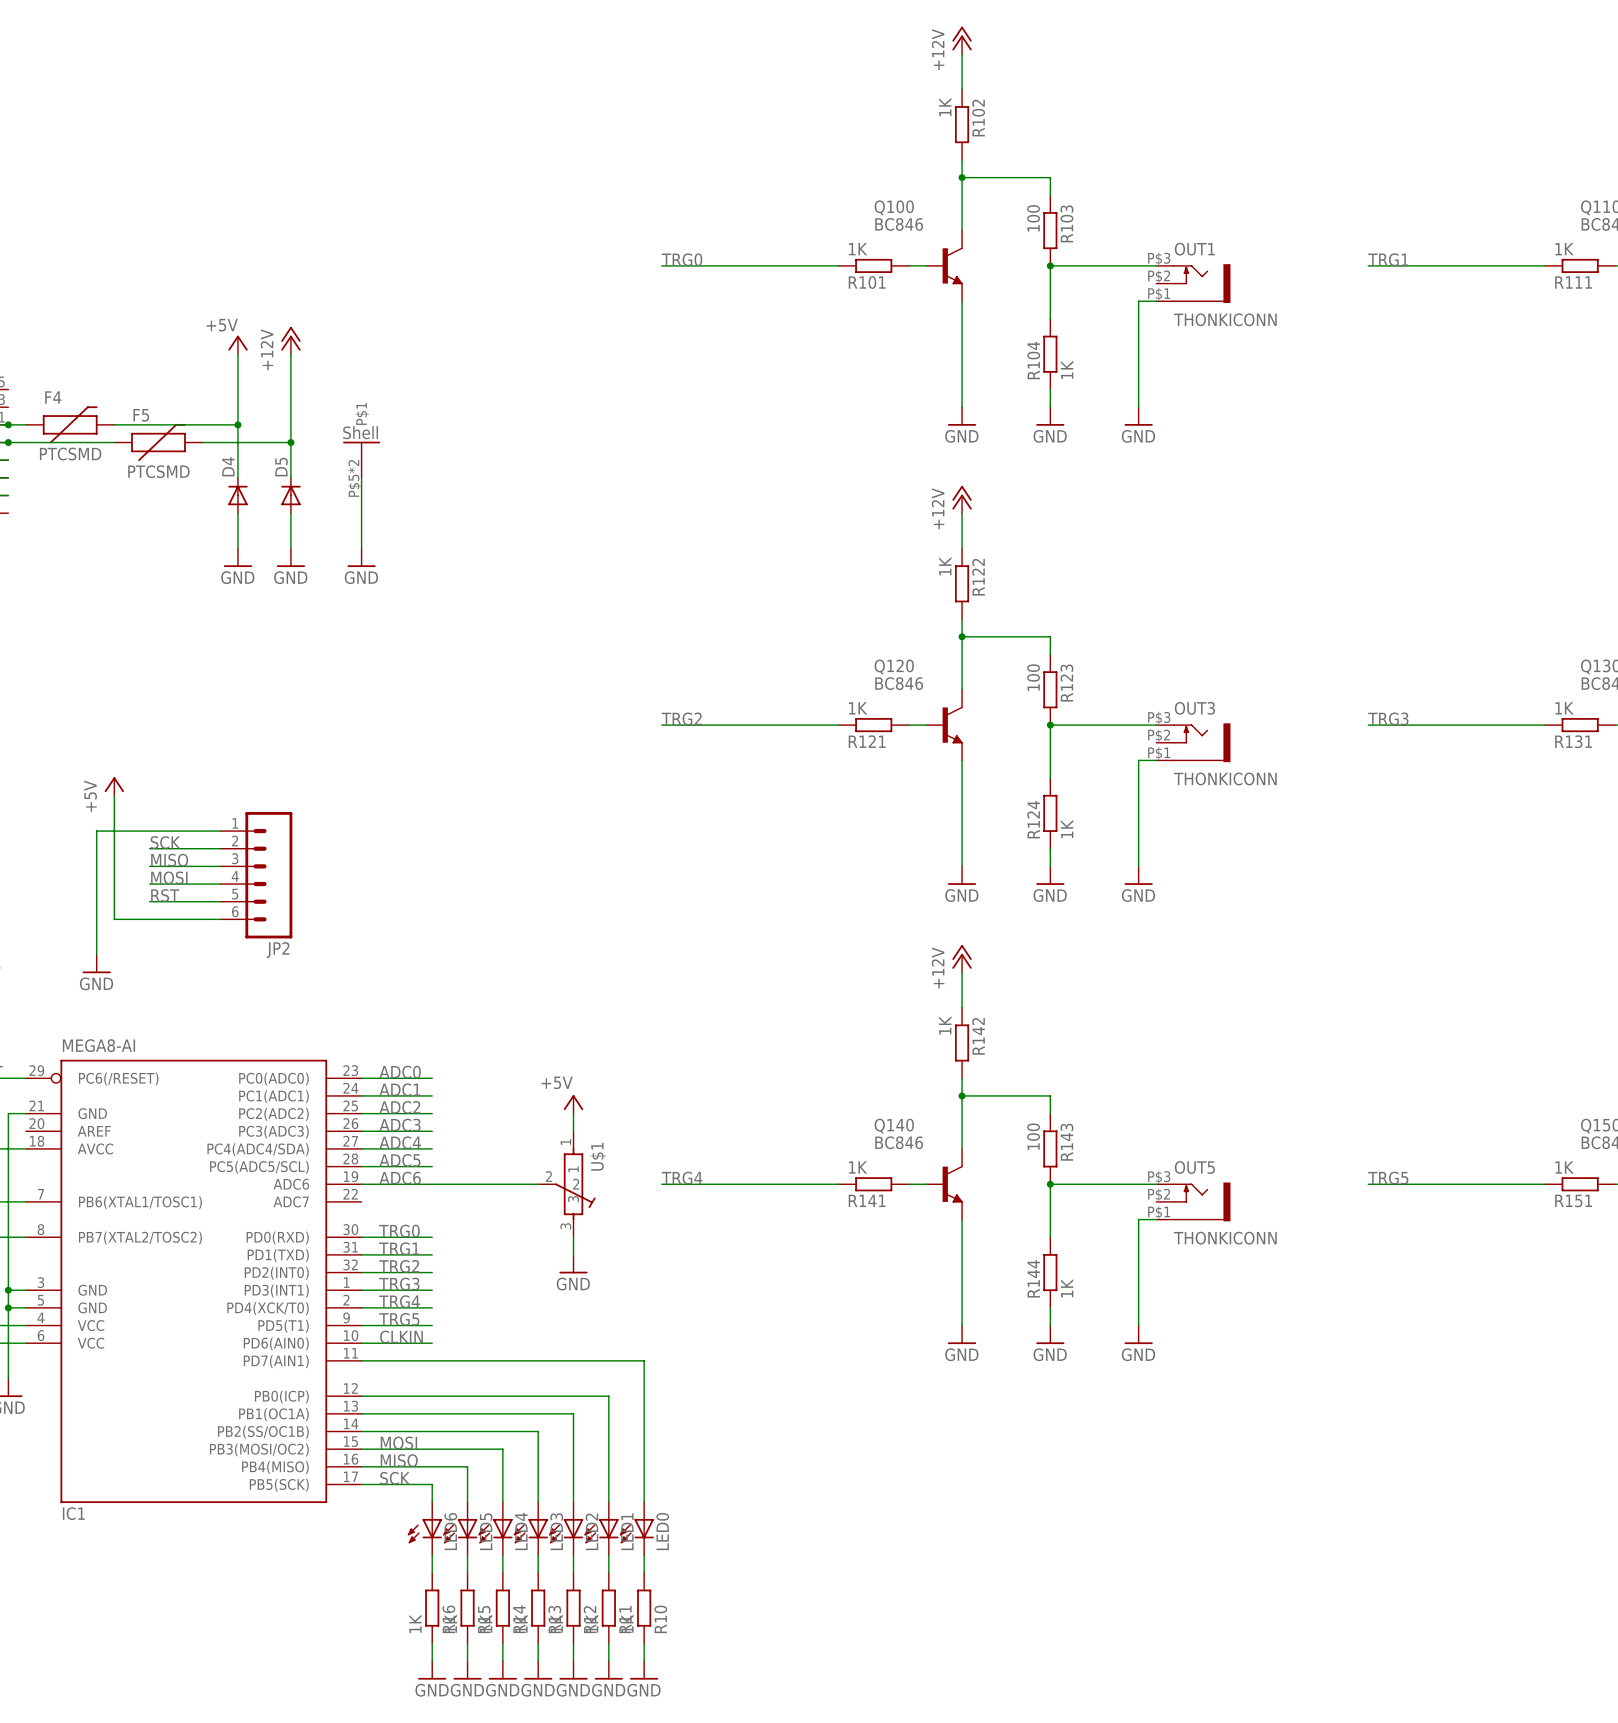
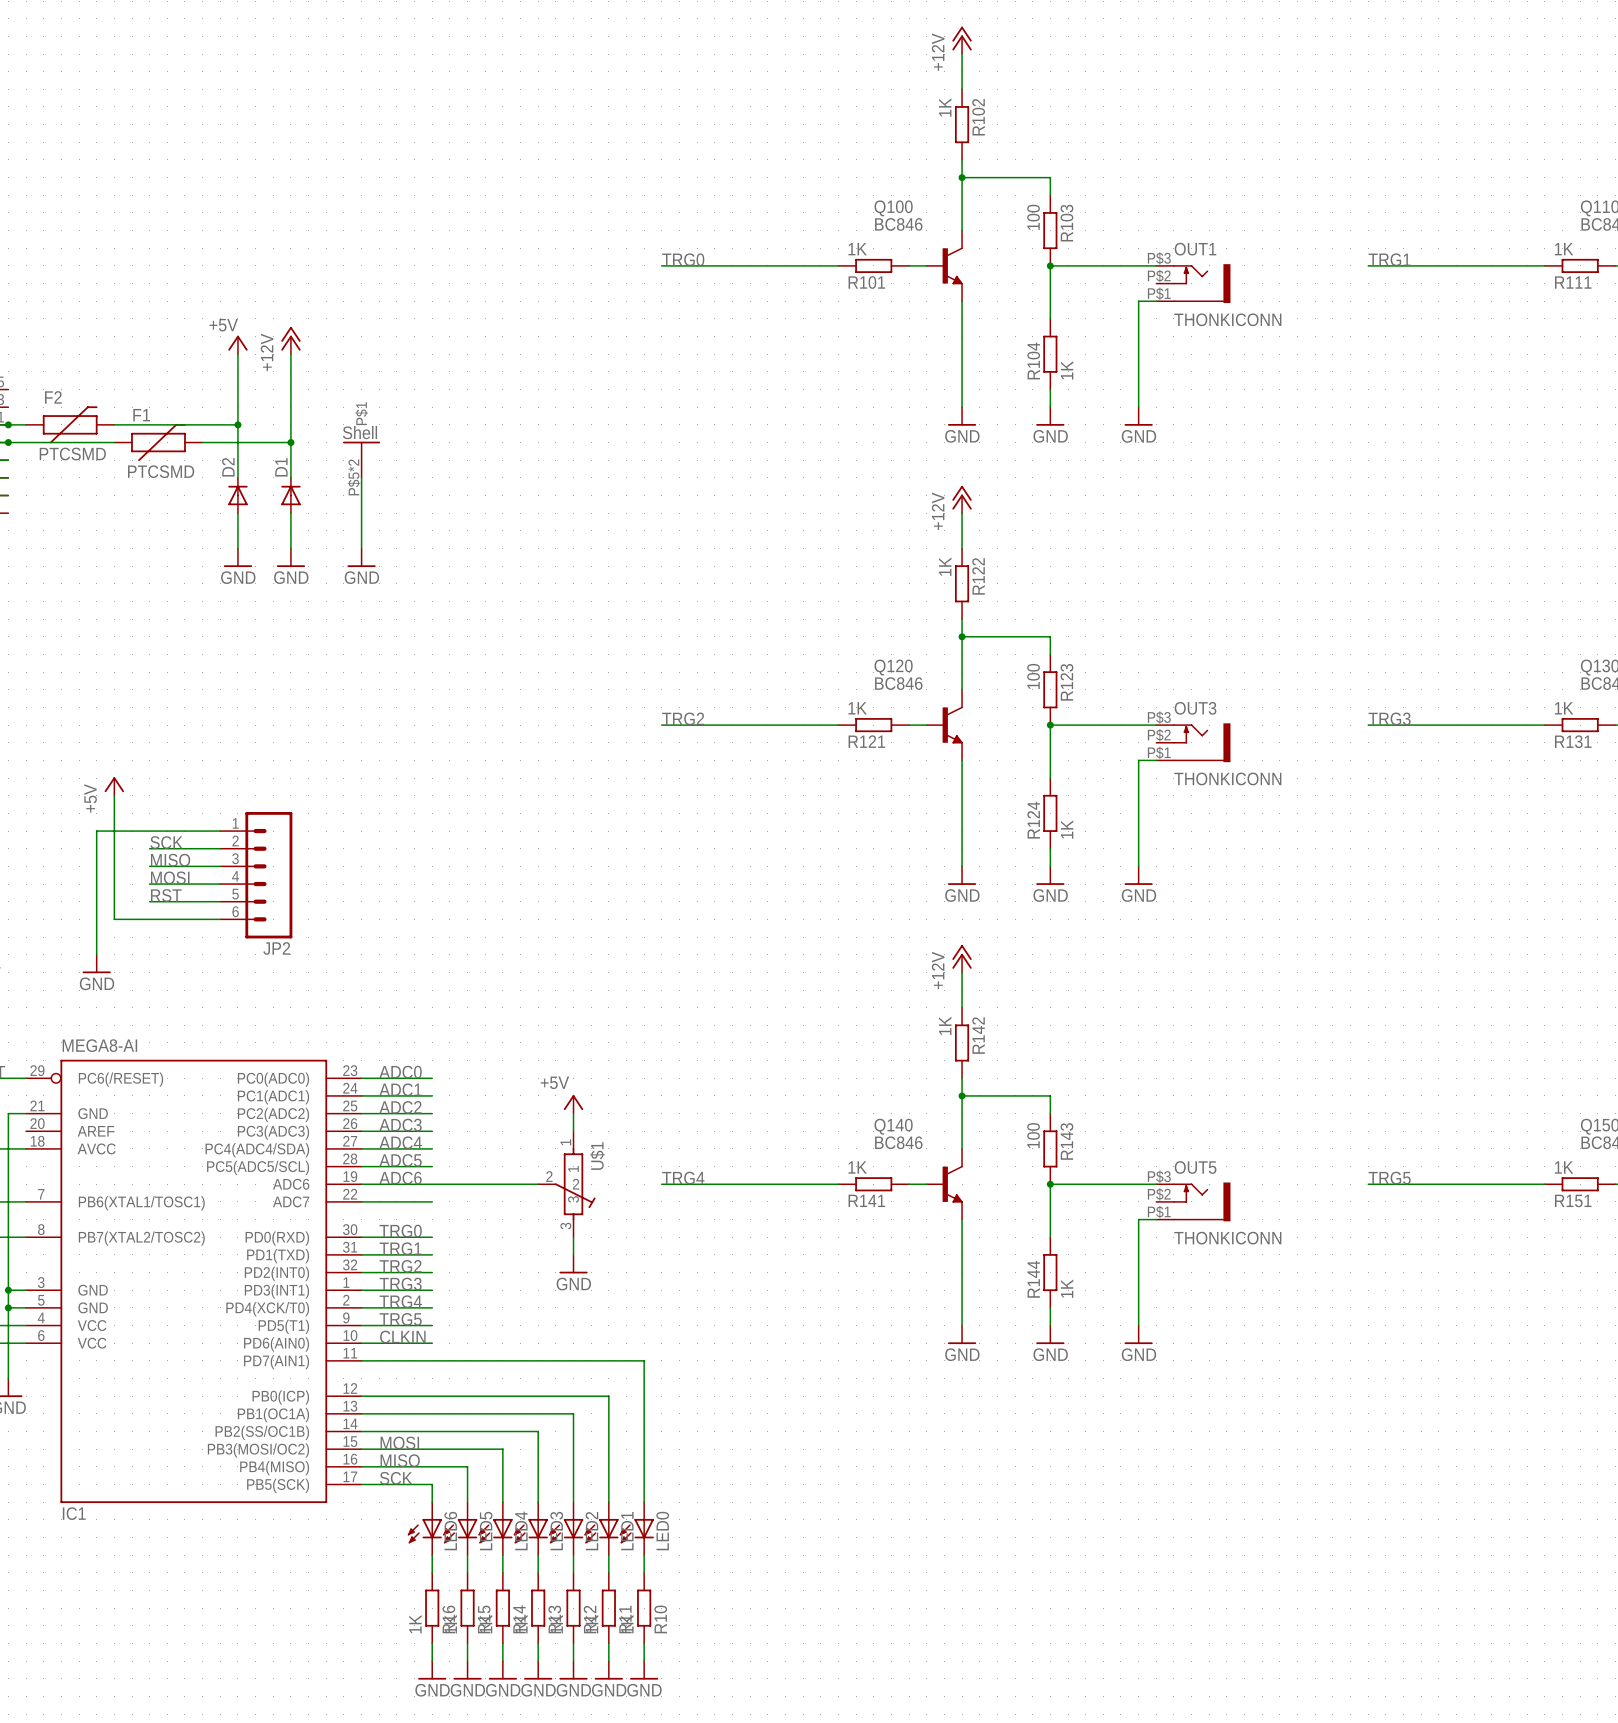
F4 name: F4 (53, 397) -> F2 (53, 397)
F5 name: F5 (141, 415) -> F1 (141, 415)
D4 name: D4 (228, 466) -> D2 (228, 467)
D5 name: D5 (281, 467) -> D1 (281, 467)
wire: none -> (361, 1201) (432, 1201)

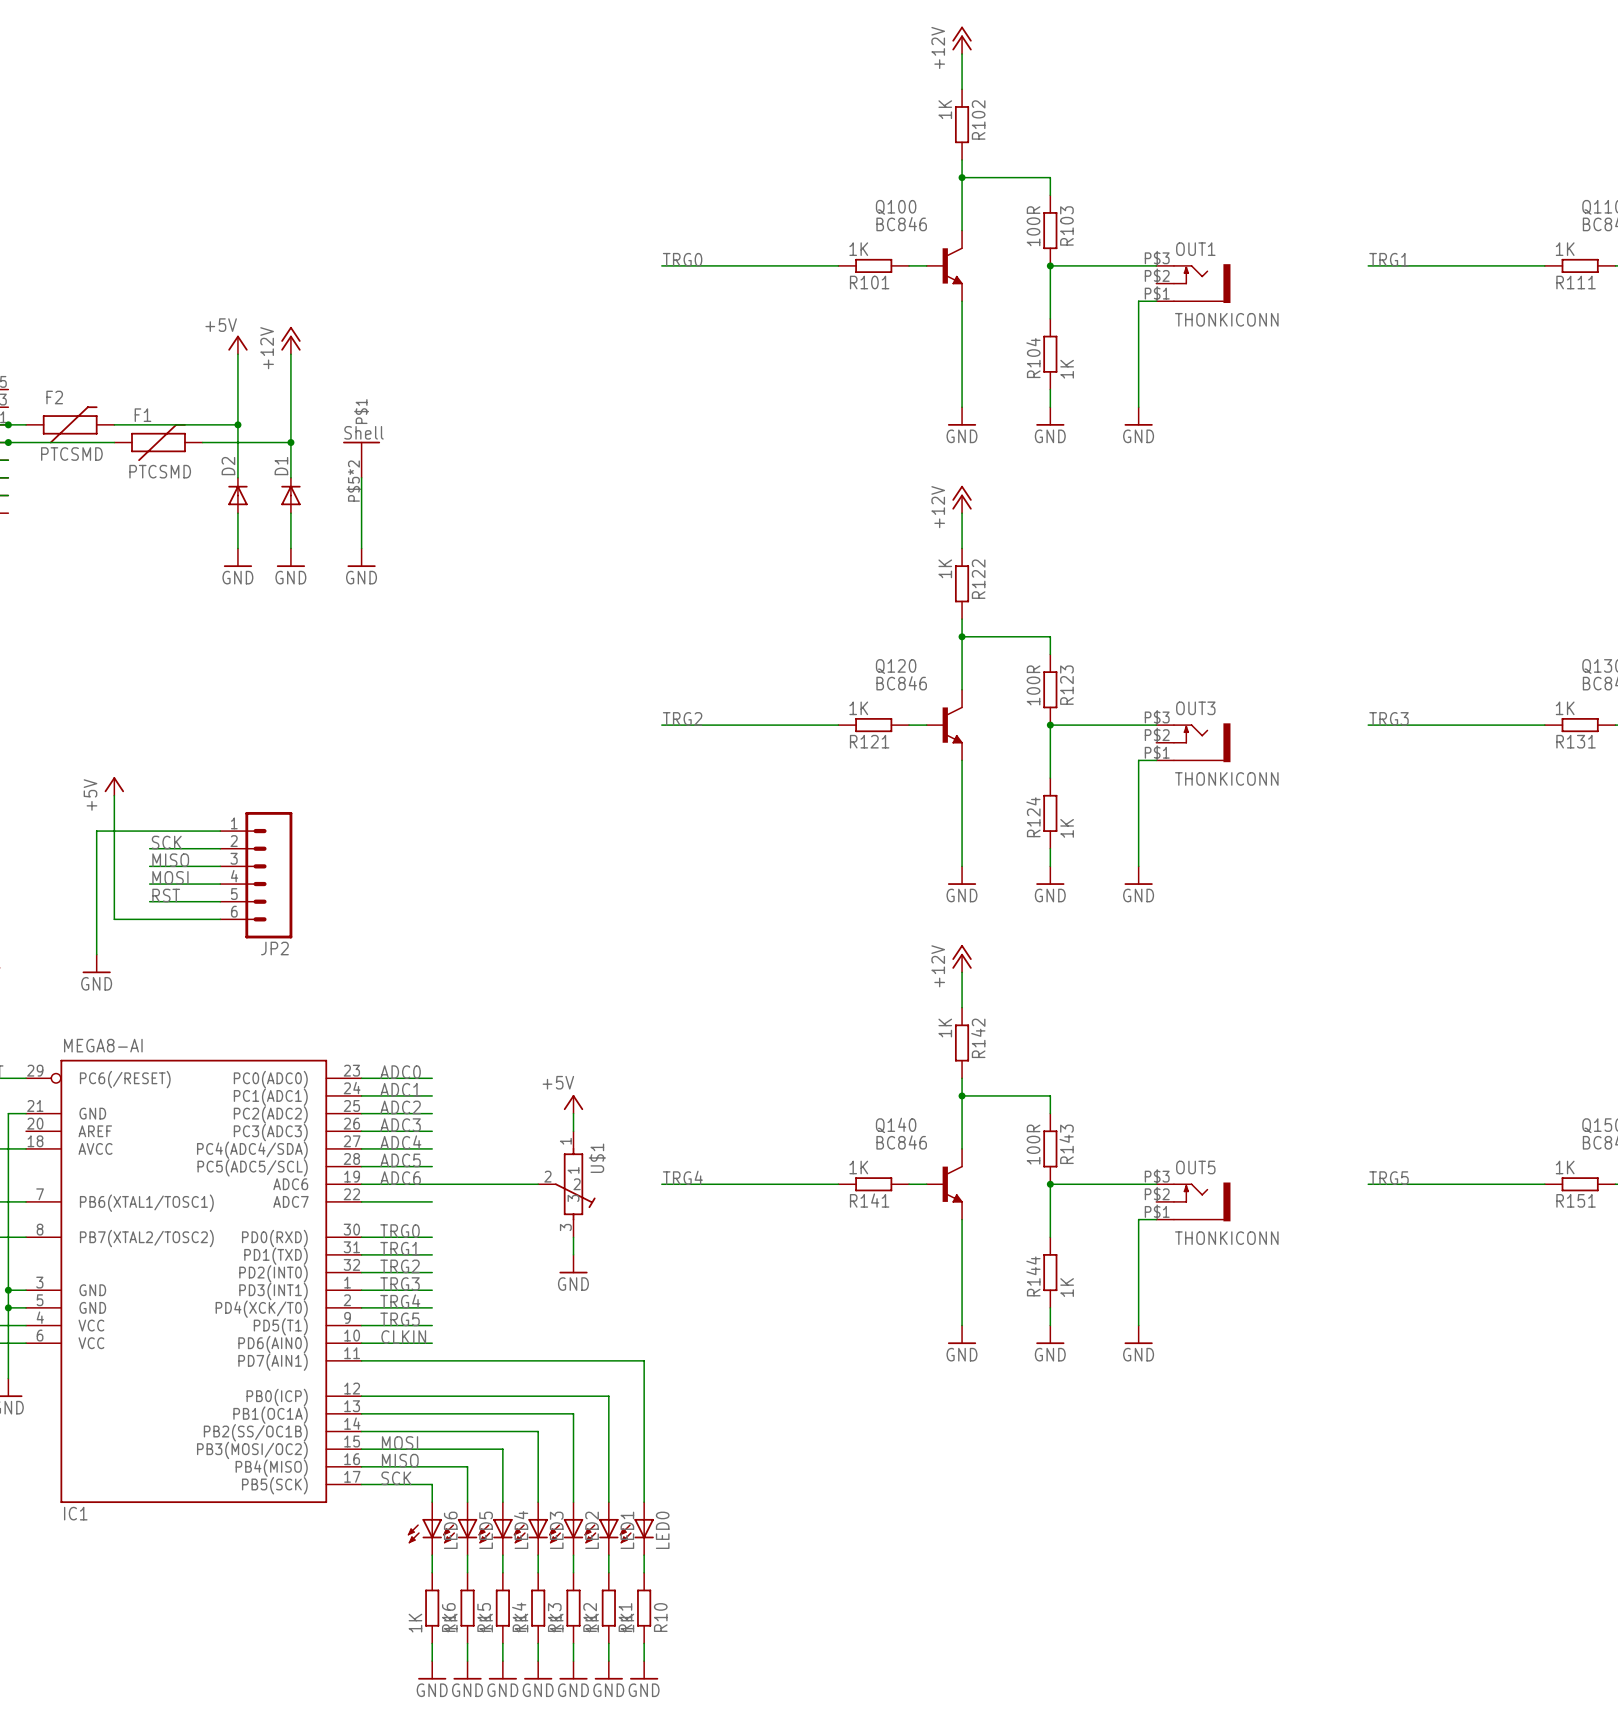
R103 value: 100 (1033, 217) -> 100R (1033, 226)
R123 value: 100 (1033, 676) -> 100R (1033, 685)
R143 value: 100 (1033, 1135) -> 100R (1033, 1144)

